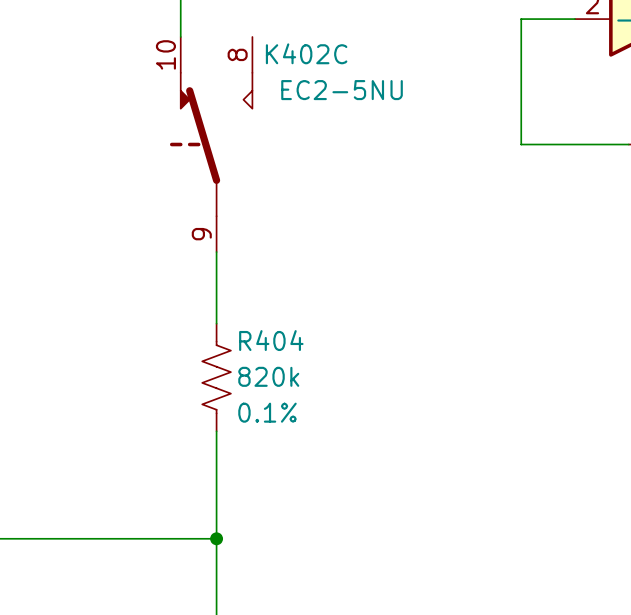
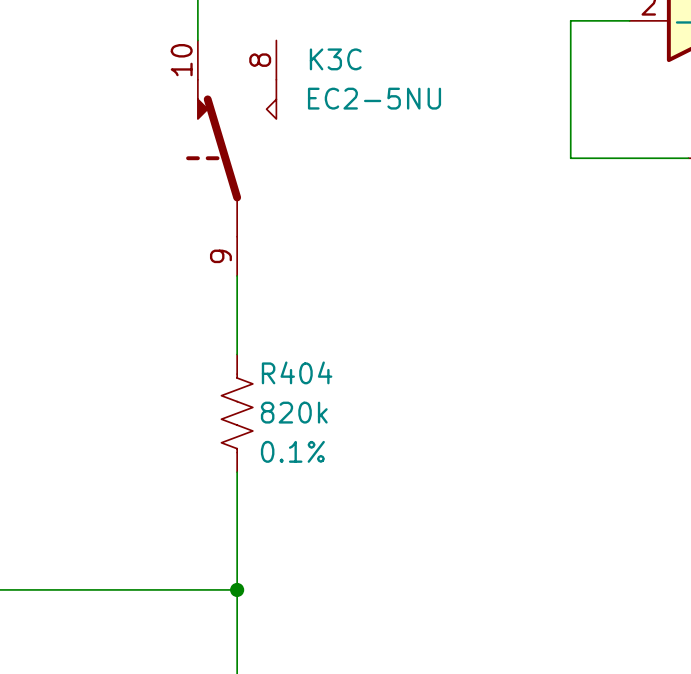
K402C name: K402C (306, 53) -> K3C (335, 59)

